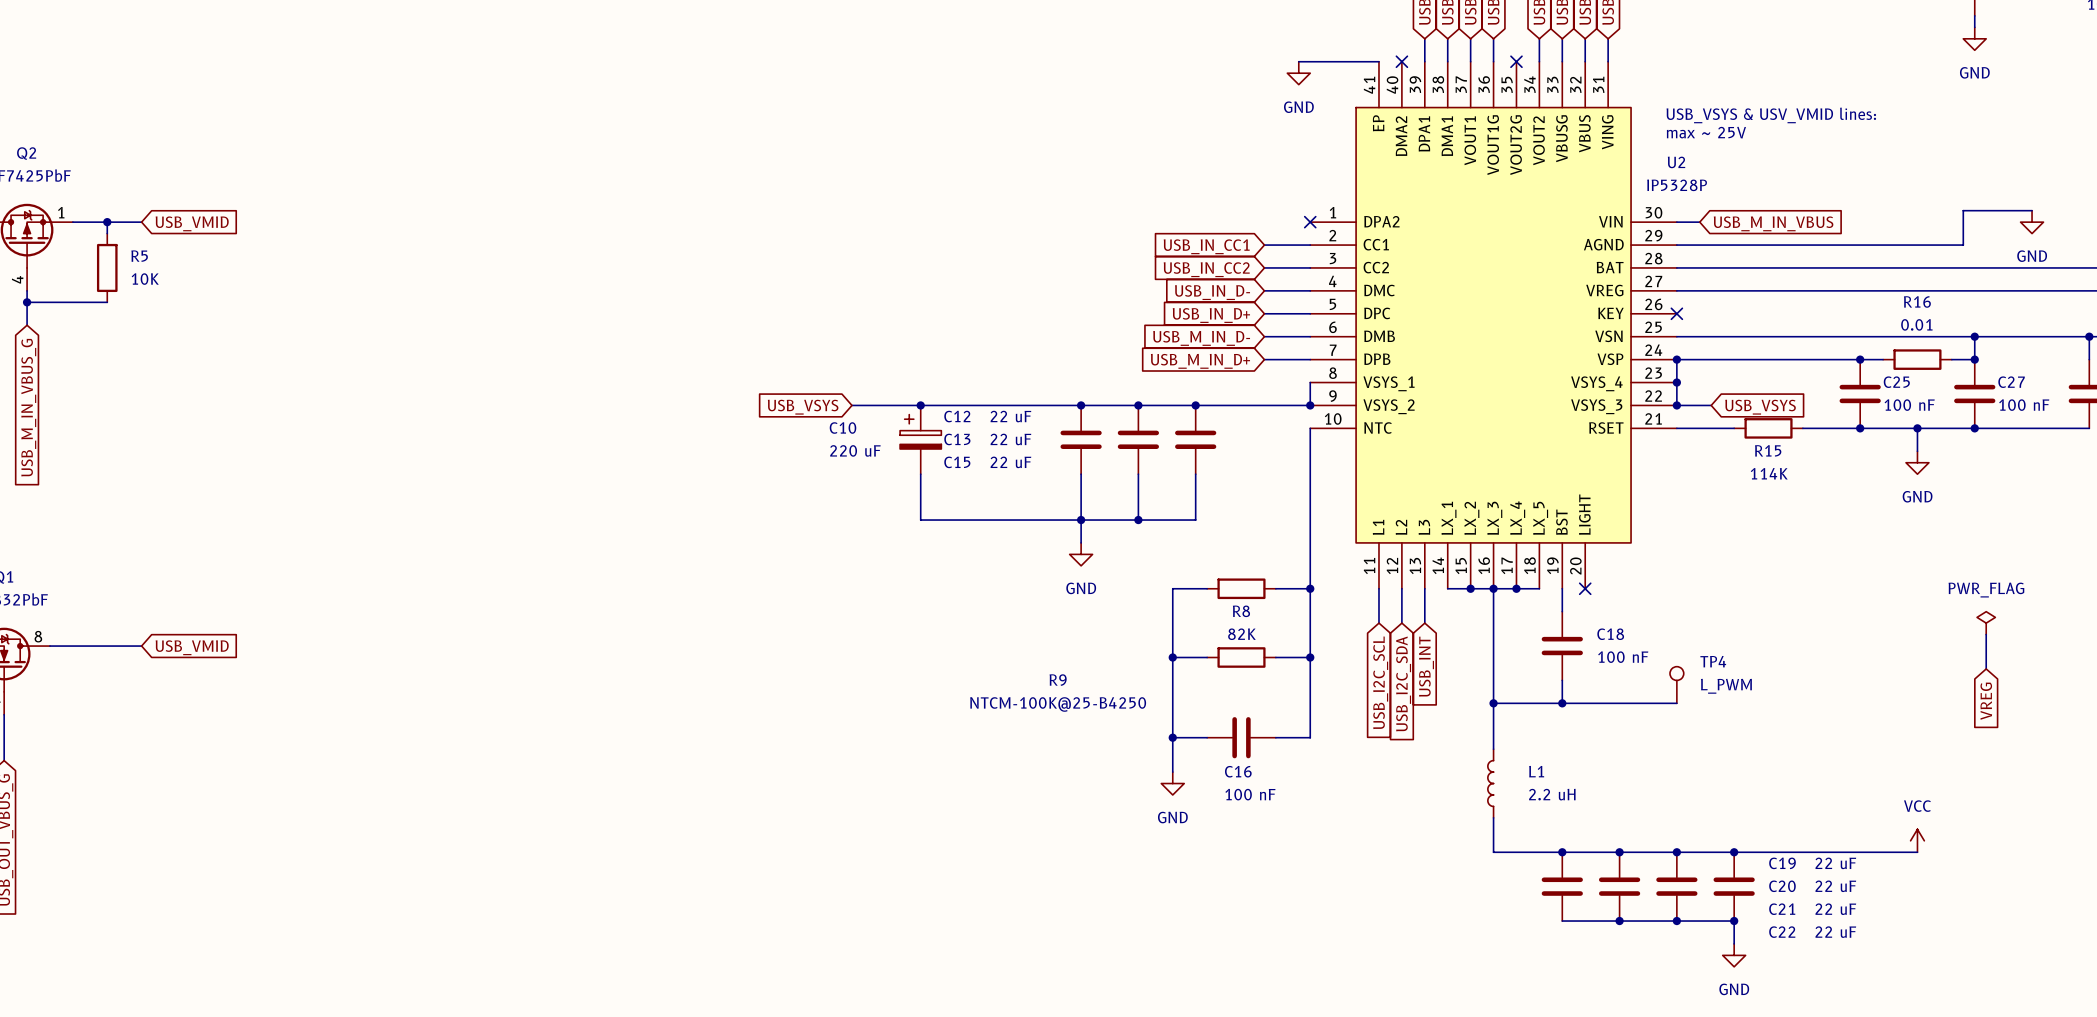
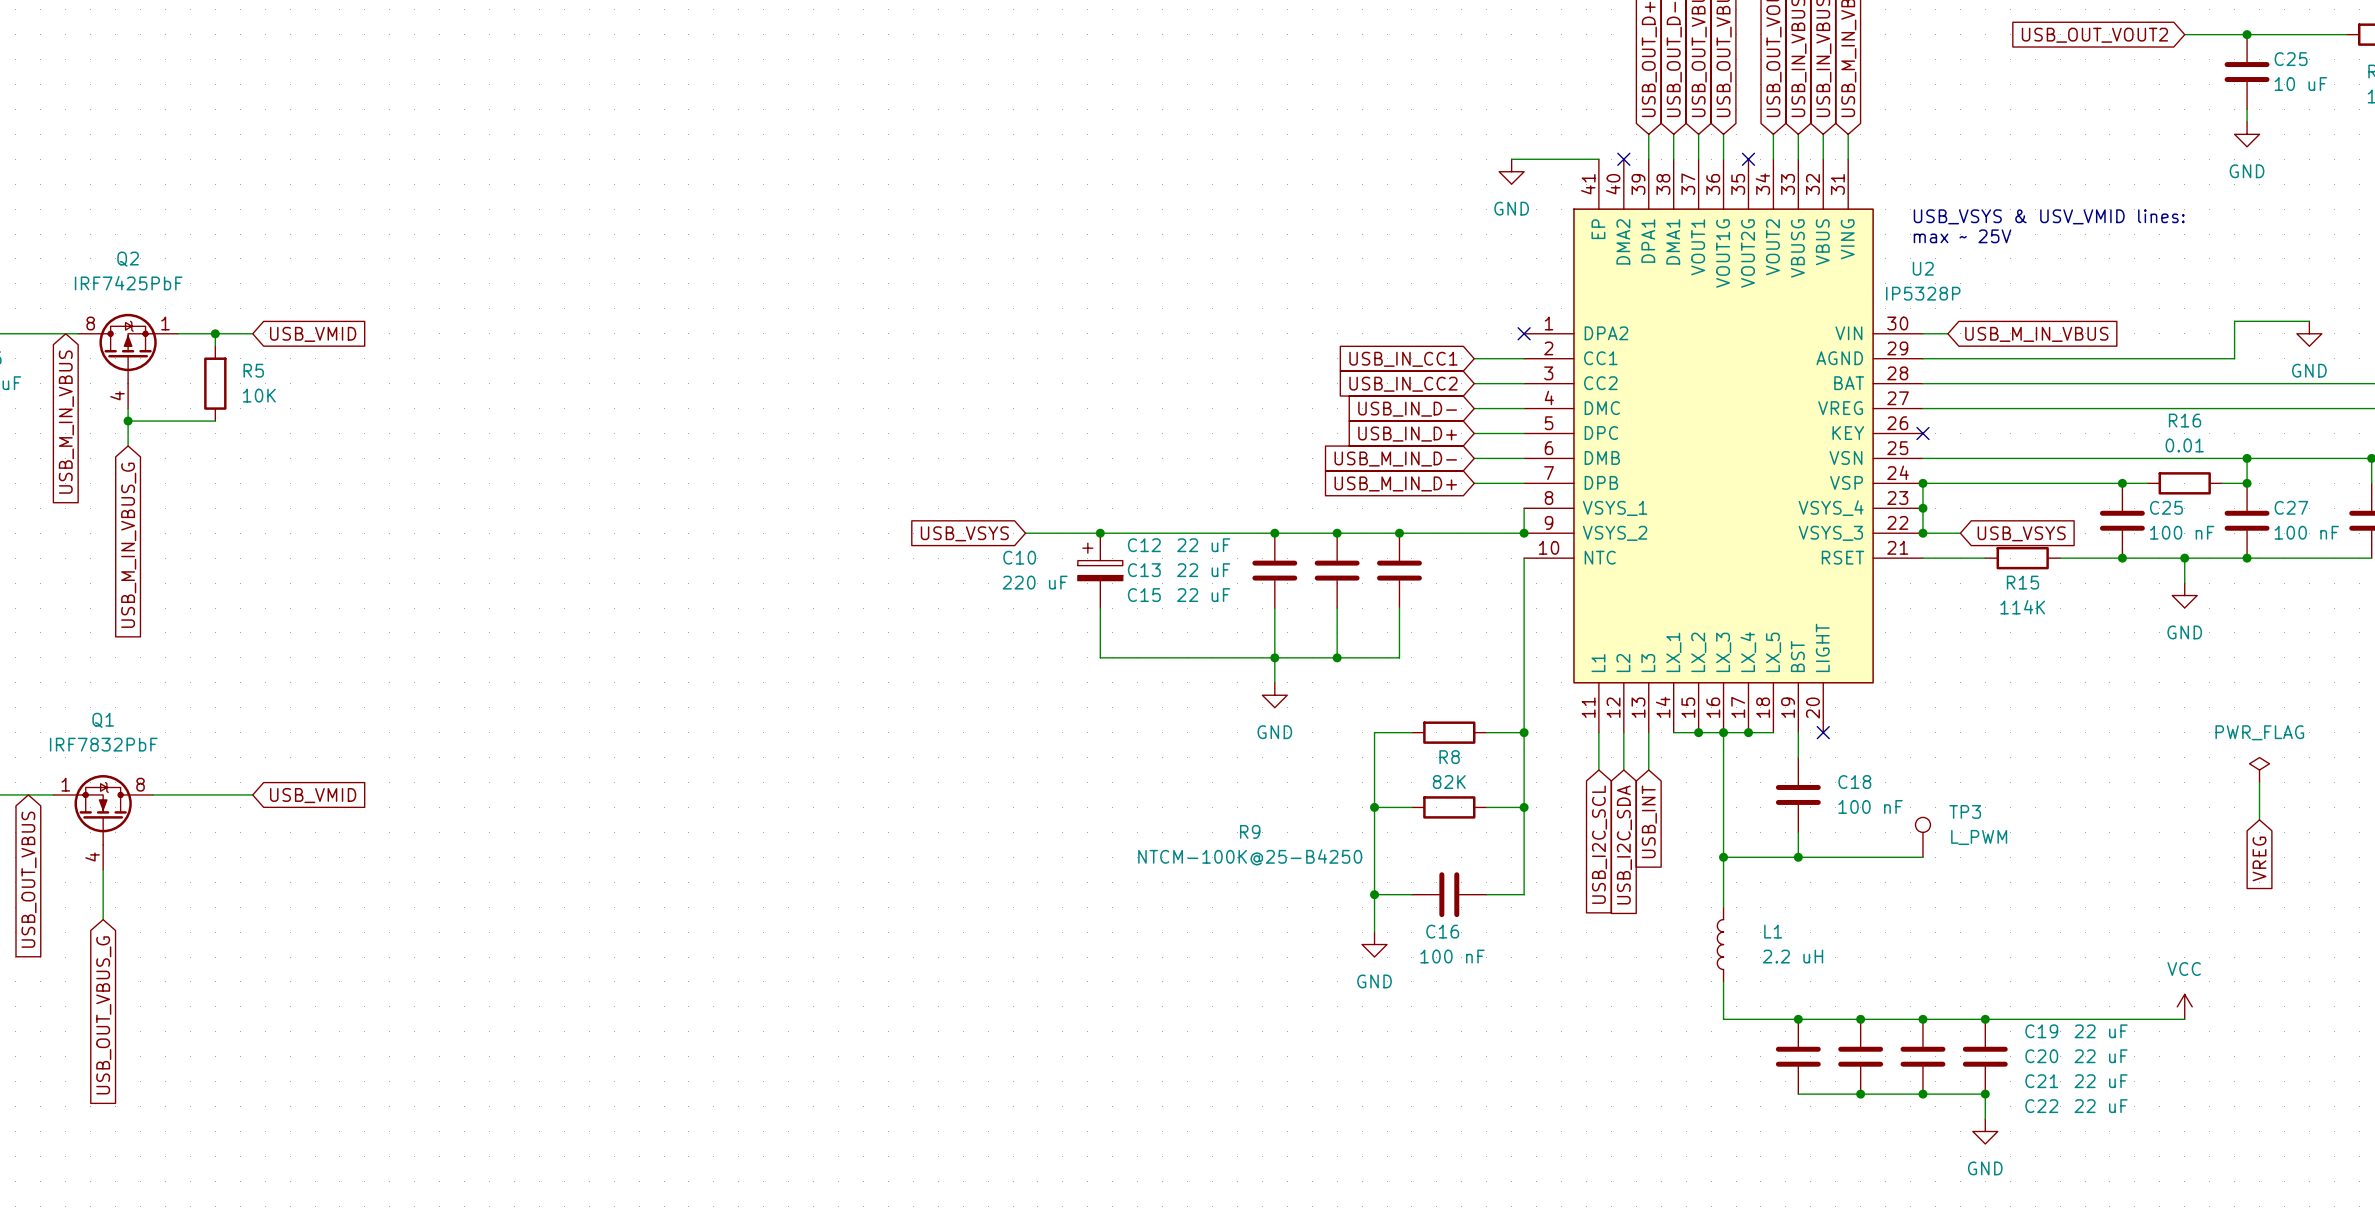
TP4 name: TP4 (1713, 661) -> TP3 (1965, 811)

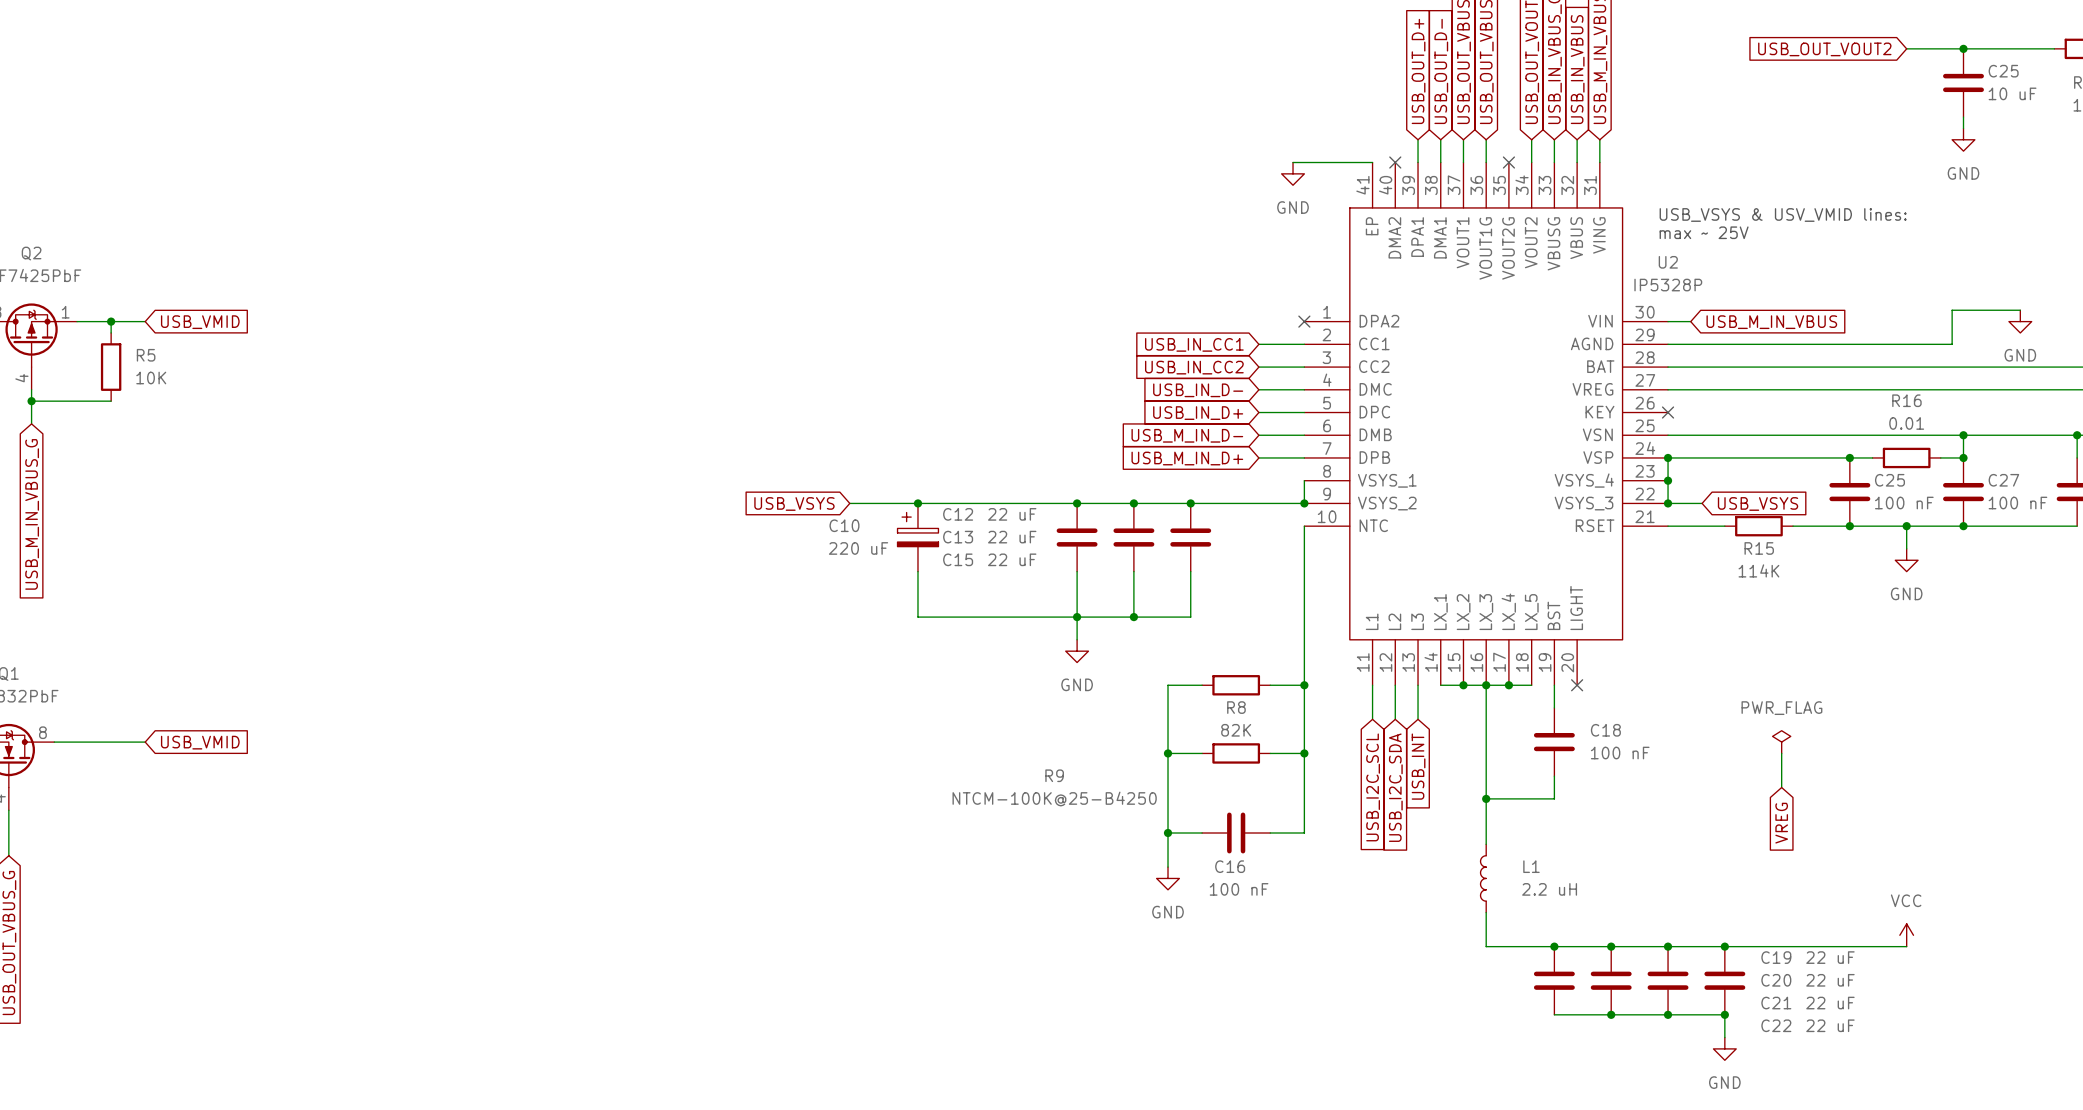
power symbol position: PWR_FLAG (2259, 770) -> PWR_FLAG (1781, 742)
wire: (2259, 782) (2259, 819) -> (1781, 753) (1781, 787)
TP3: L_PWM (1922, 837) -> none
wire: (1798, 857) (1922, 857) -> none
junction: (1798, 857) -> none
global label position: VREG (2259, 858) -> VREG (1781, 823)

